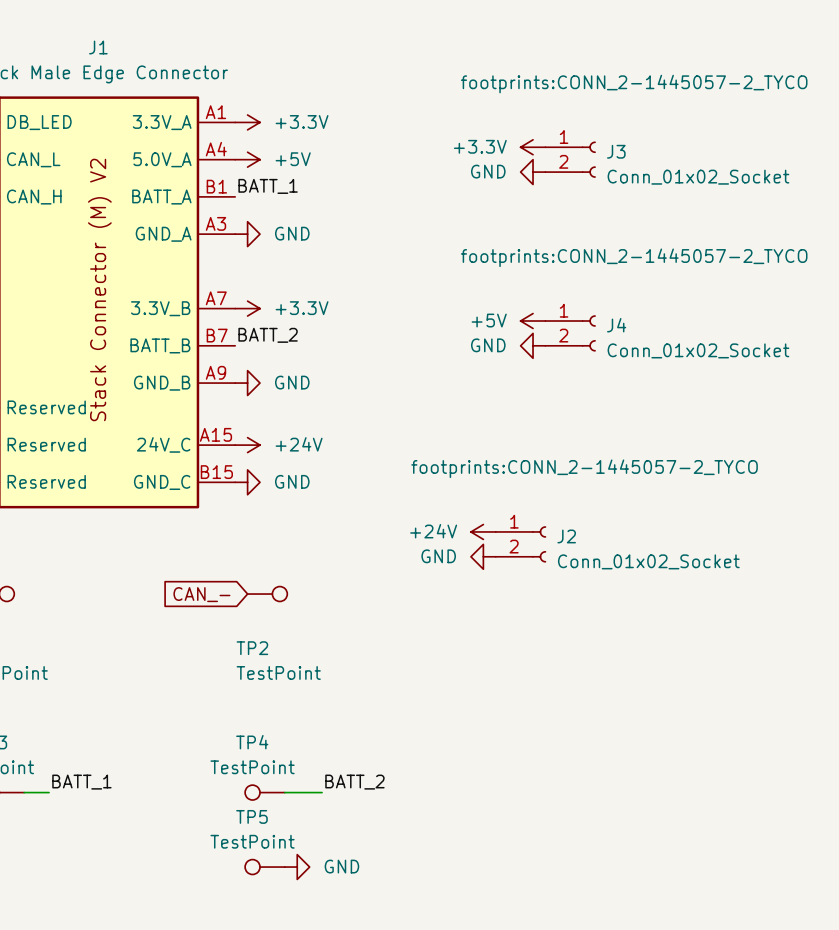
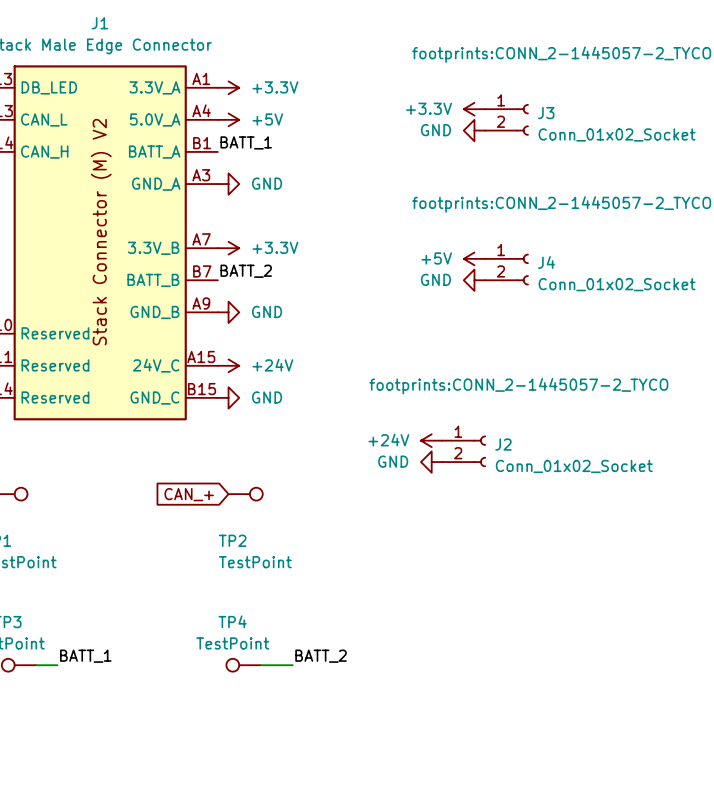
global label: CAN_- (201, 594) -> CAN_+ (189, 494)
TP5: TestPoint (264, 867) -> none
power symbol: GND (297, 867) -> none

